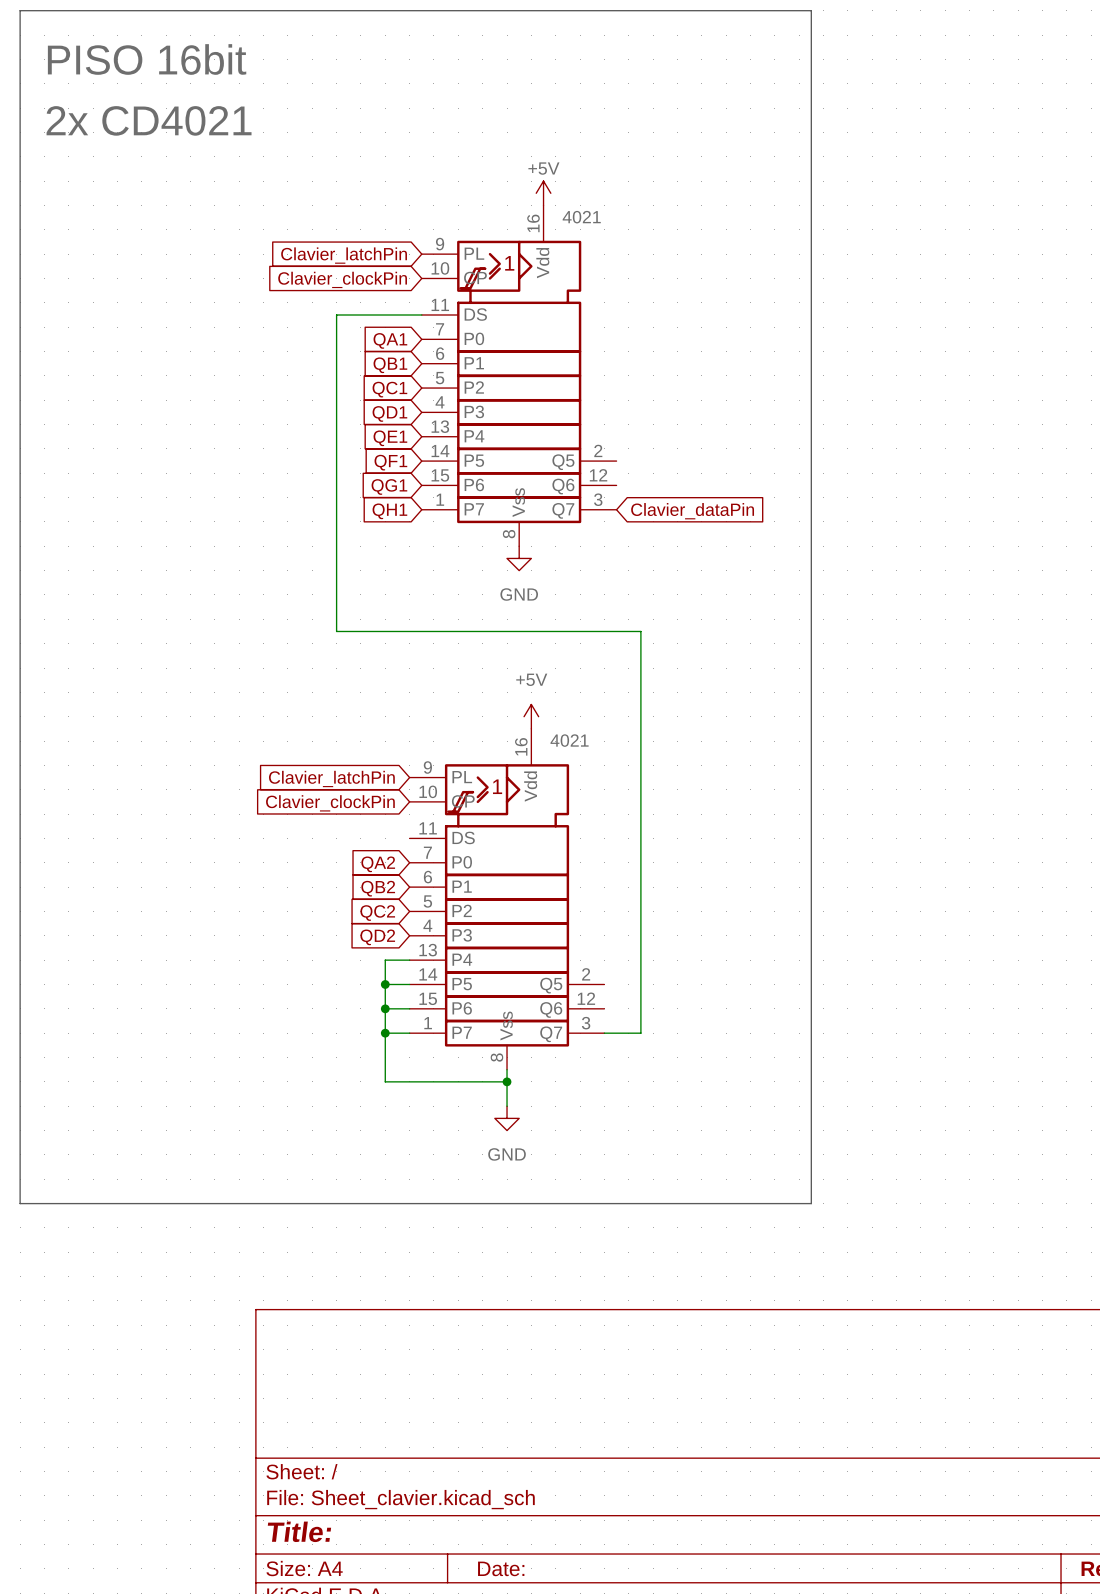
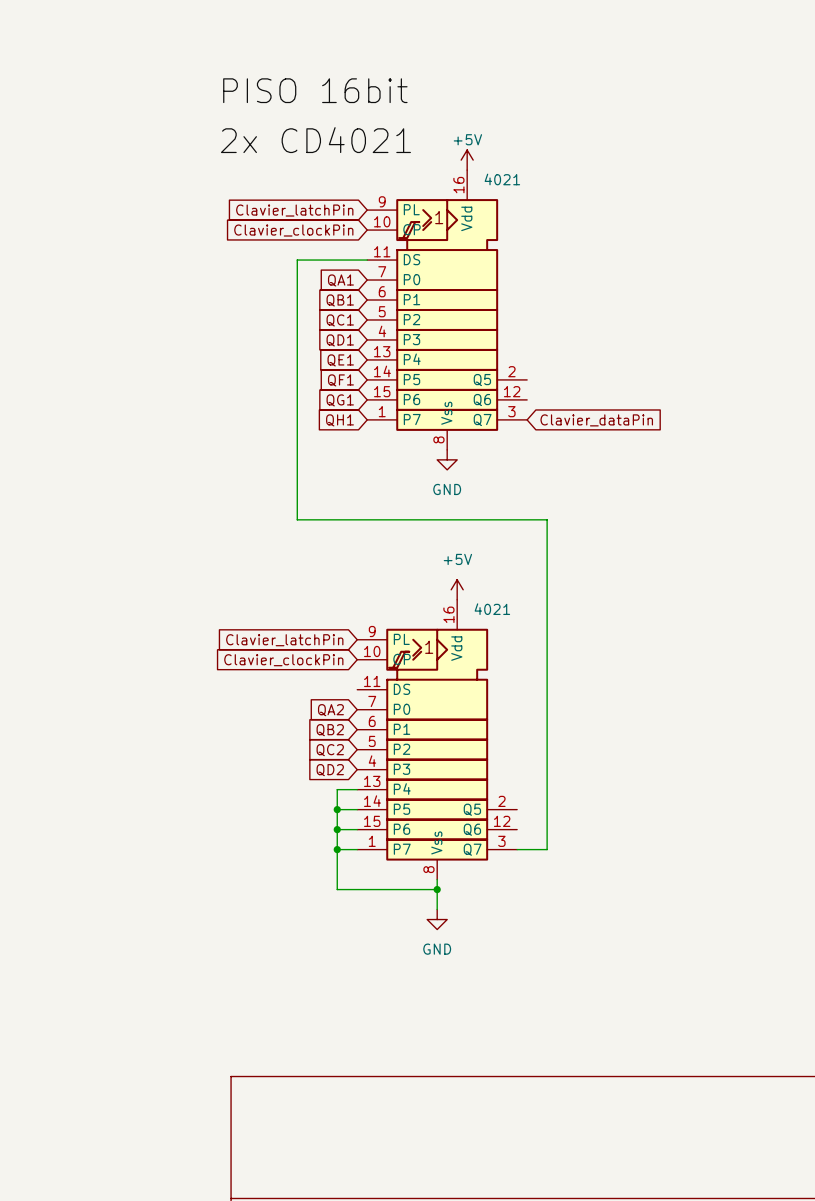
line: (20, 10) (811, 10) (811, 1203) (20, 1203) (20, 10) -> none
label position: PISO 16bit (147, 59) -> PISO 16bit (315, 90)
label position: 2x CD4021 (149, 120) -> 2x CD4021 (315, 140)

